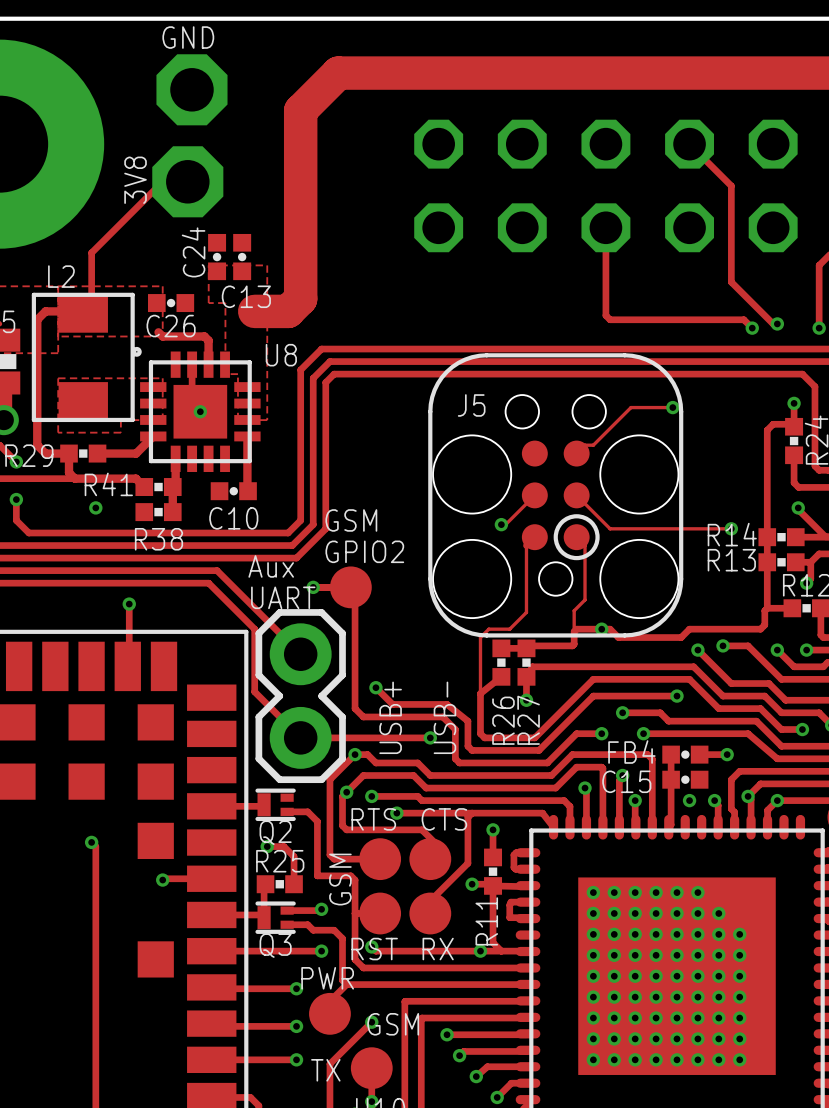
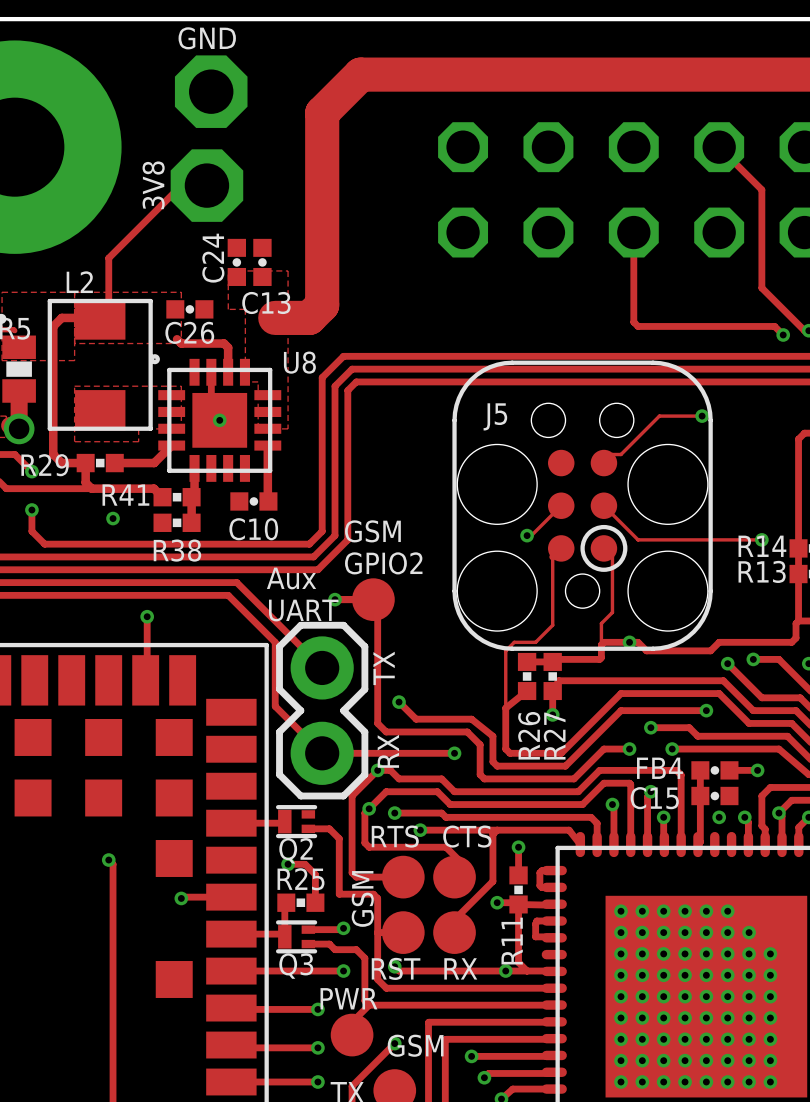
text: none -> TX (384, 668)
text: USB+ (390, 717) -> RX (388, 751)
text: USB- (444, 717) -> none

